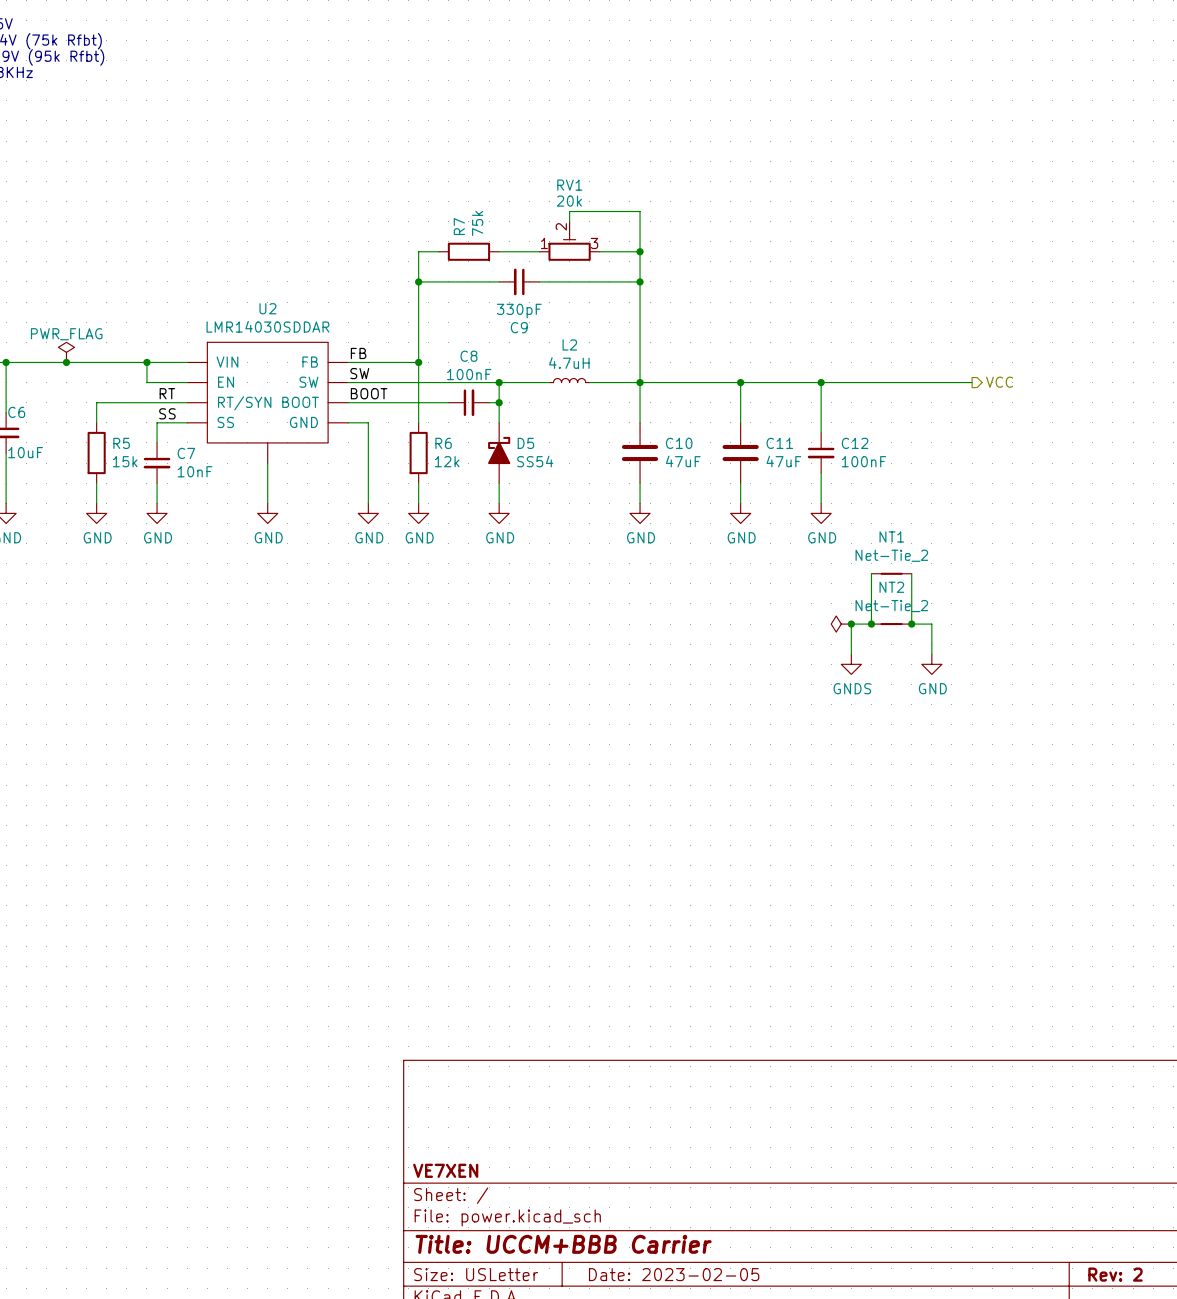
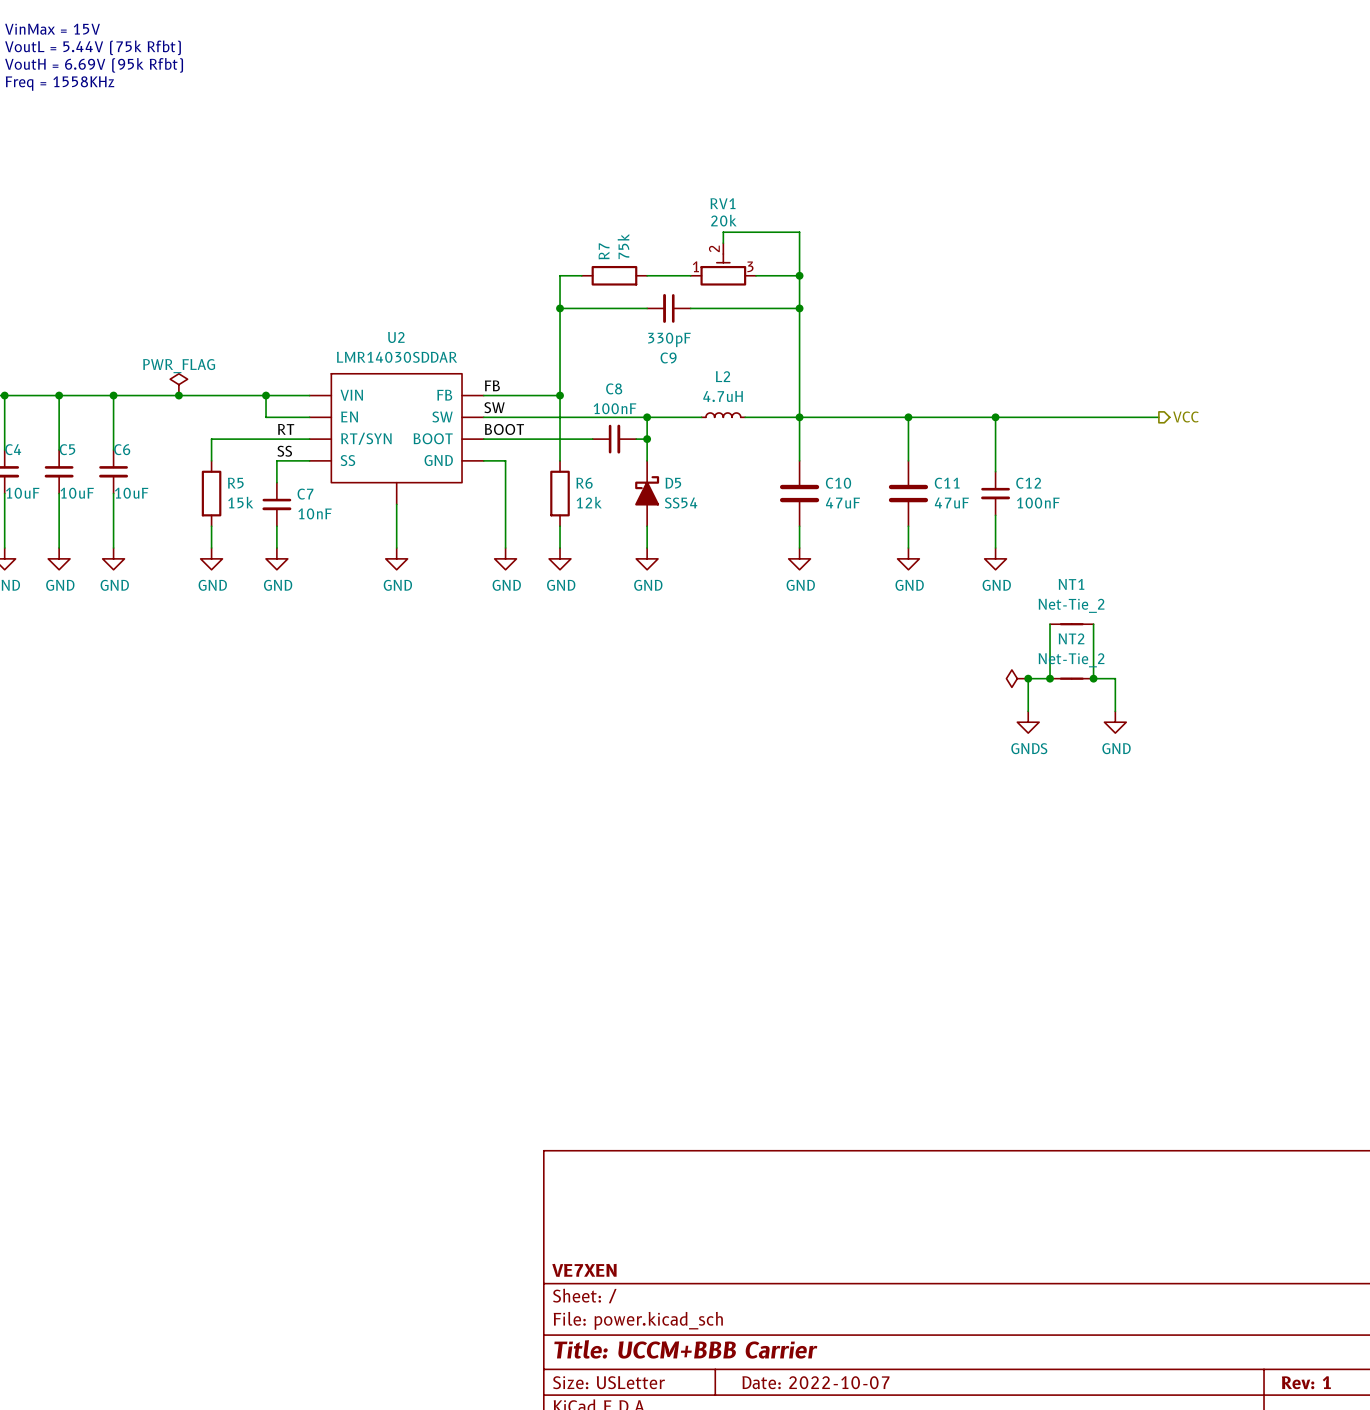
title block: Date: 2023-02-05 (674, 1274) -> Date: 2022-10-07 (815, 1382)
title block: Rev: 2 (1115, 1274) -> Rev: 1 (1306, 1382)

